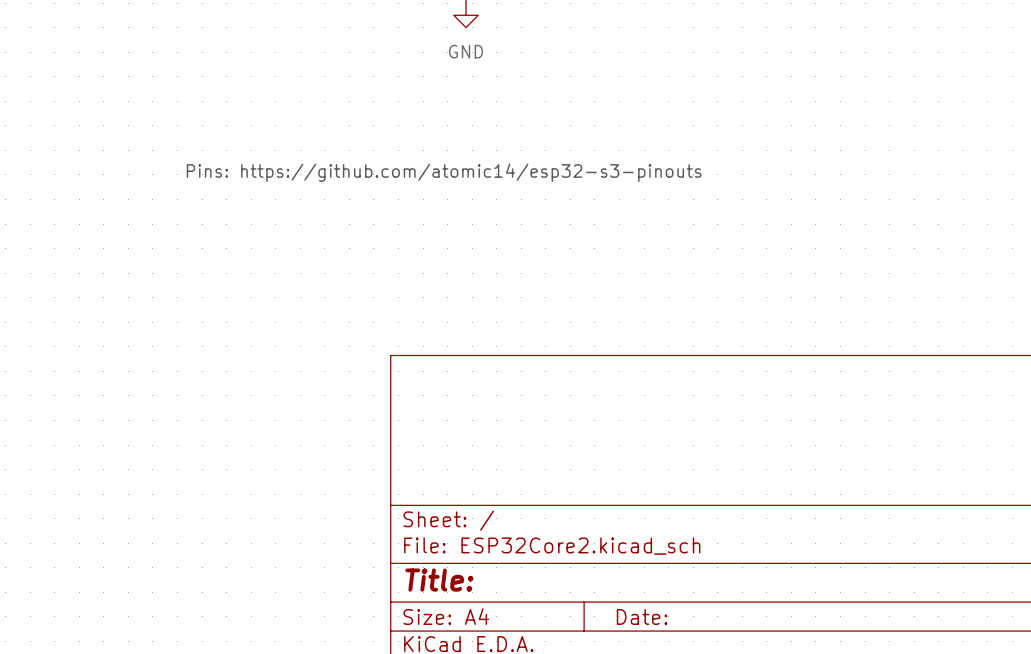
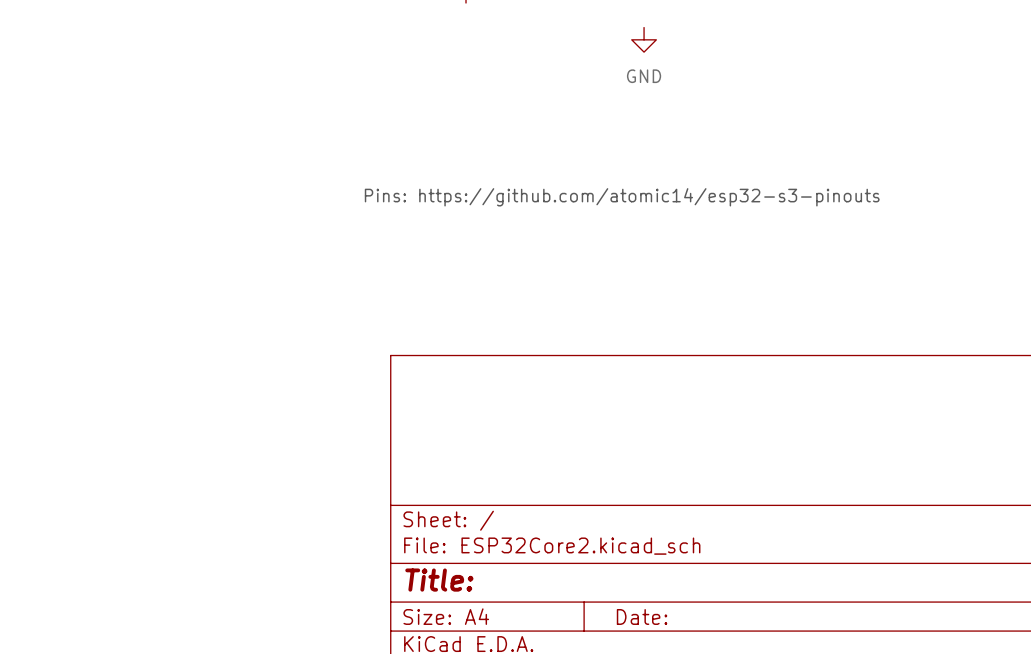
power symbol position: GND (466, 15) -> GND (644, 39)
text position: Pins: https://github.com/atomic14/esp32-s3-pinouts (444, 172) -> Pins: https://github.com/atomic14/esp32-s3-pinouts (622, 197)

